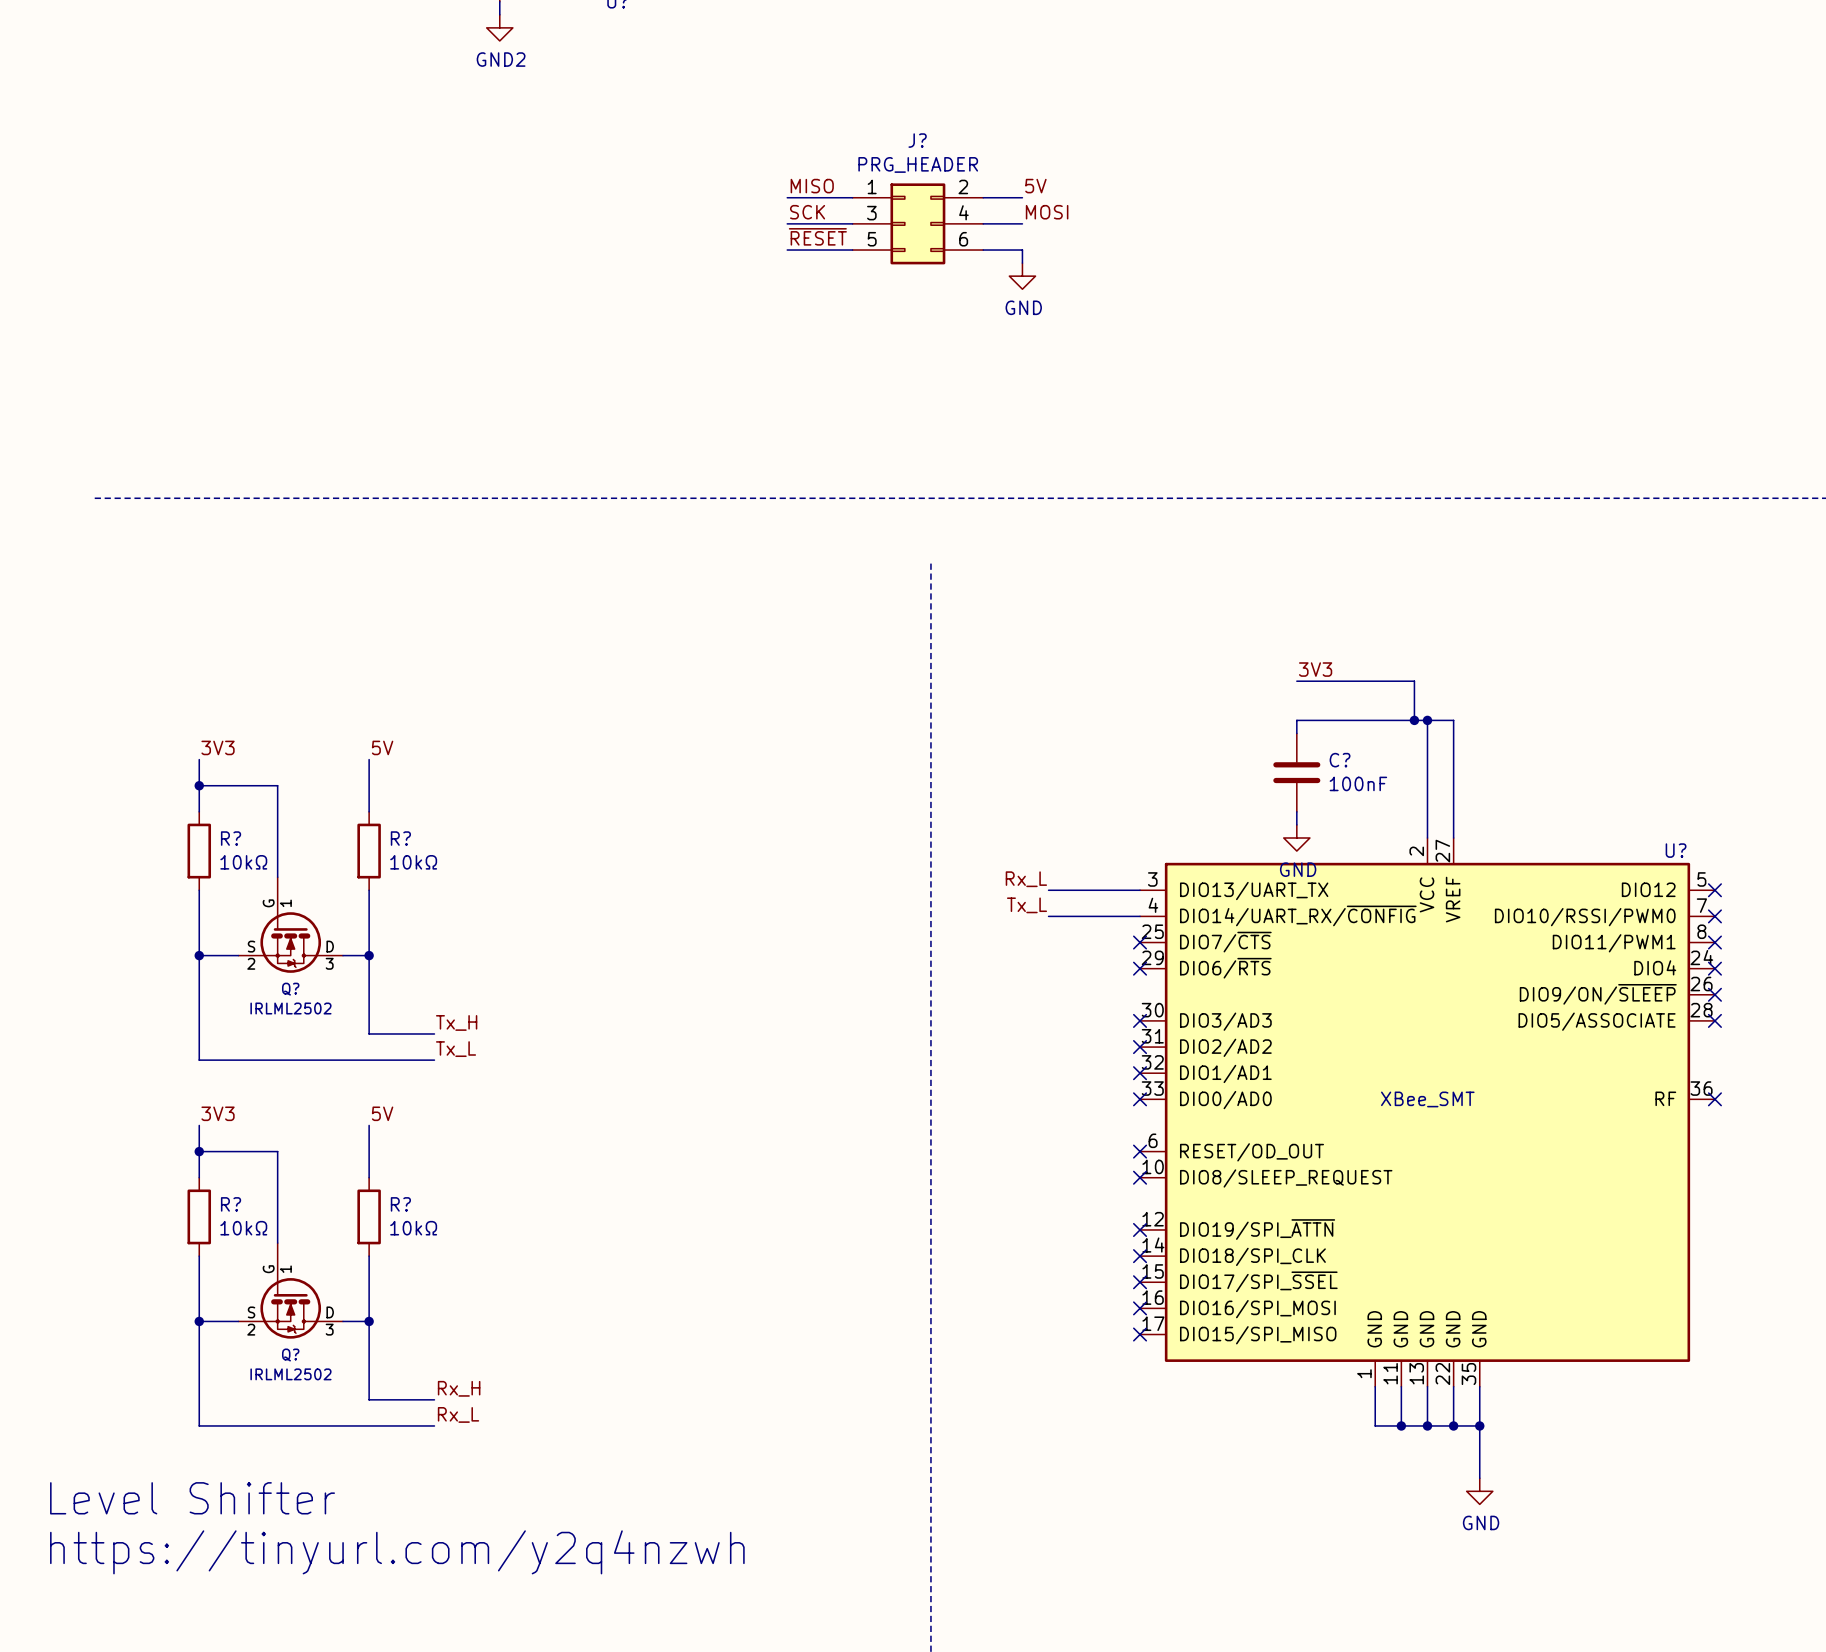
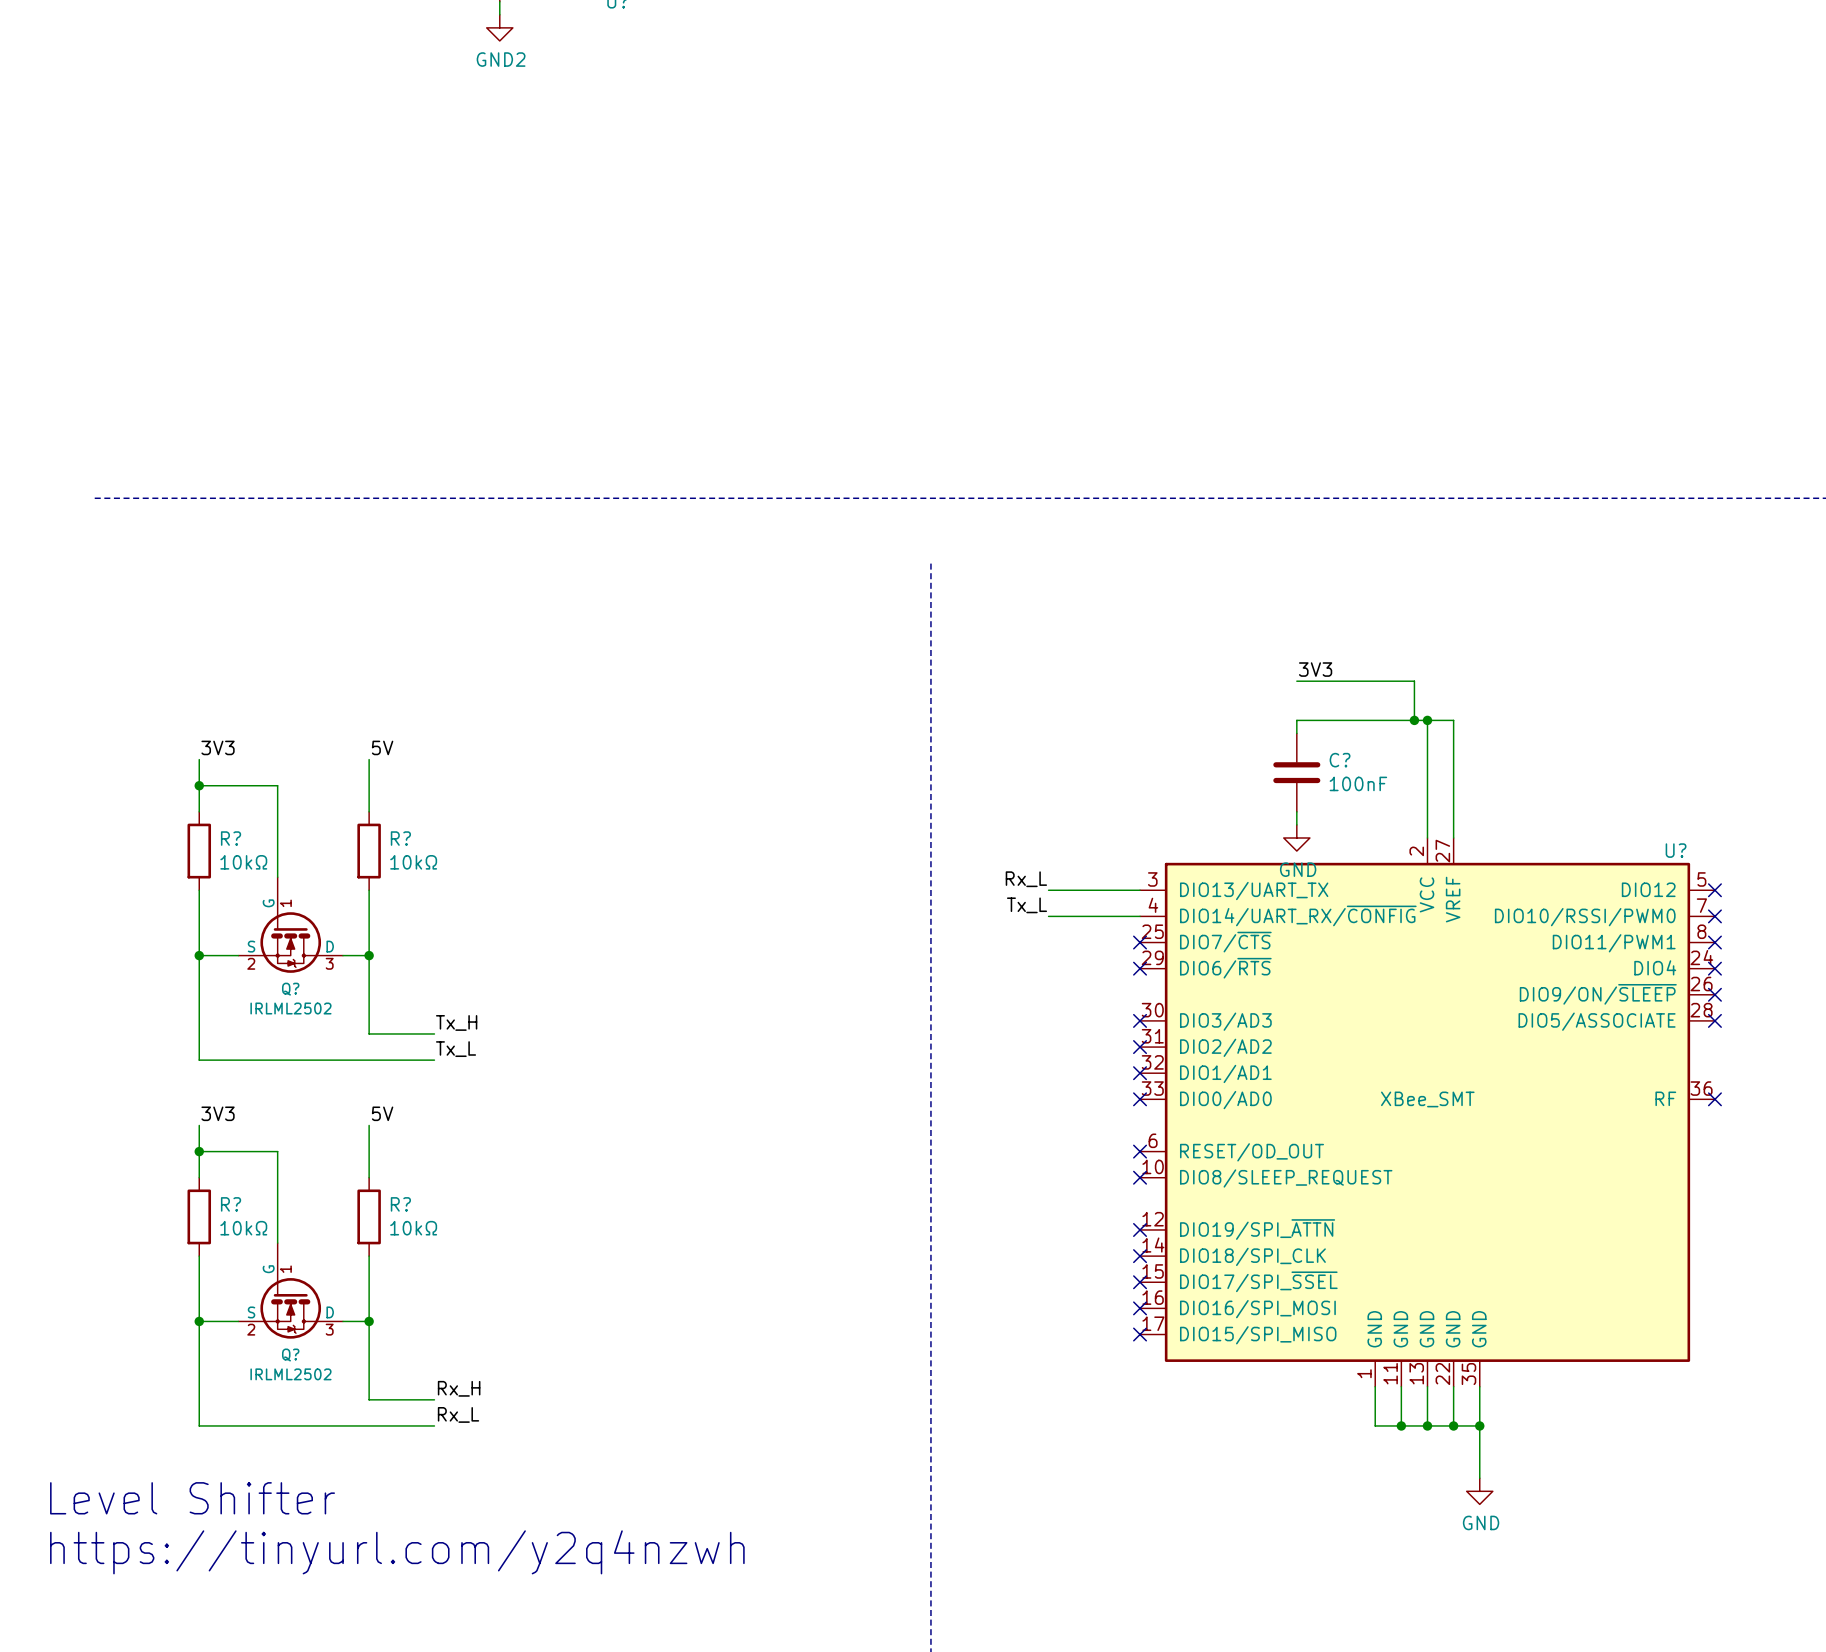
label: MISO (812, 186) -> none
label: 5V (1035, 186) -> none
wire: (787, 197) (852, 197) -> none
wire: (983, 197) (1022, 197) -> none
label: SCK (807, 212) -> none
label: MOSI (1047, 212) -> none
wire: (787, 223) (852, 223) -> none
J?: PRG_HEADER (917, 223) -> none
wire: (983, 223) (1022, 223) -> none
label: ~{RESET} (817, 236) -> none
wire: (787, 250) (852, 250) -> none
wire: (983, 250) (1022, 250) (1022, 263) -> none
power symbol: GND (1022, 276) -> none

